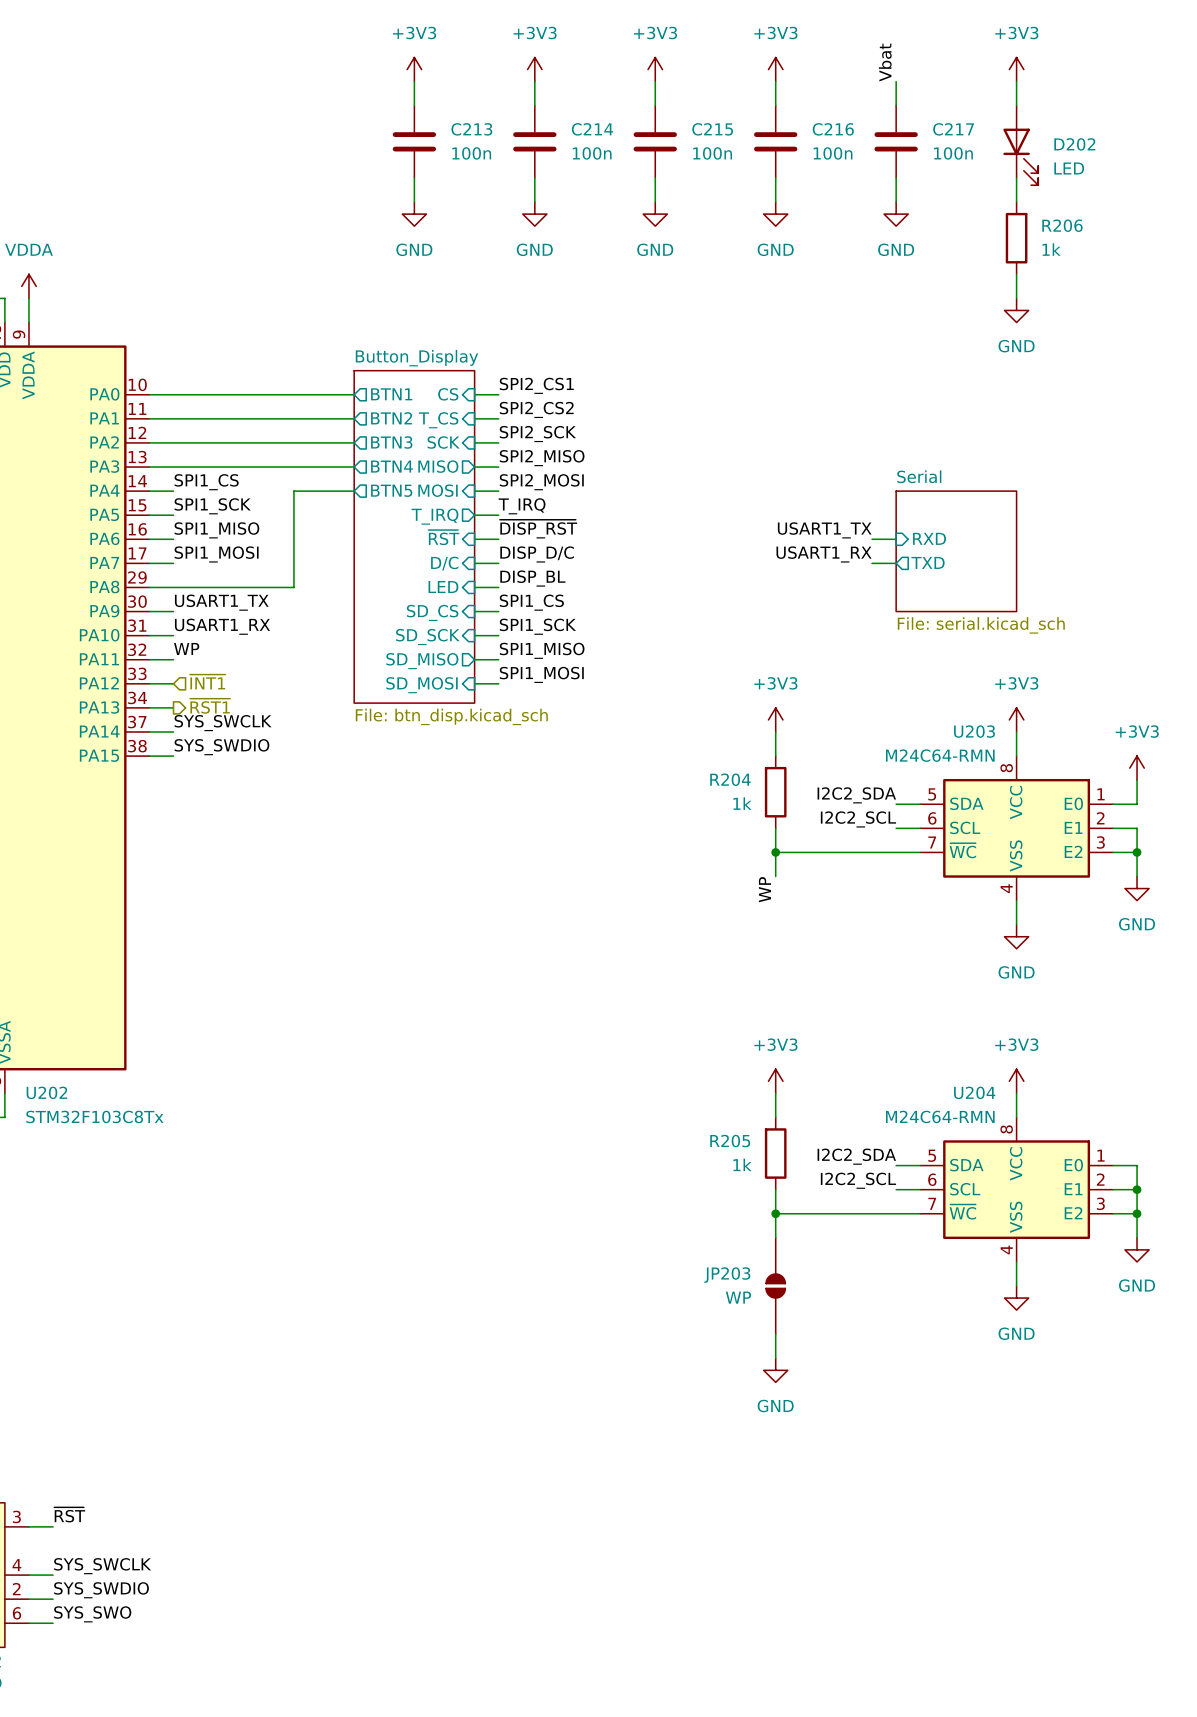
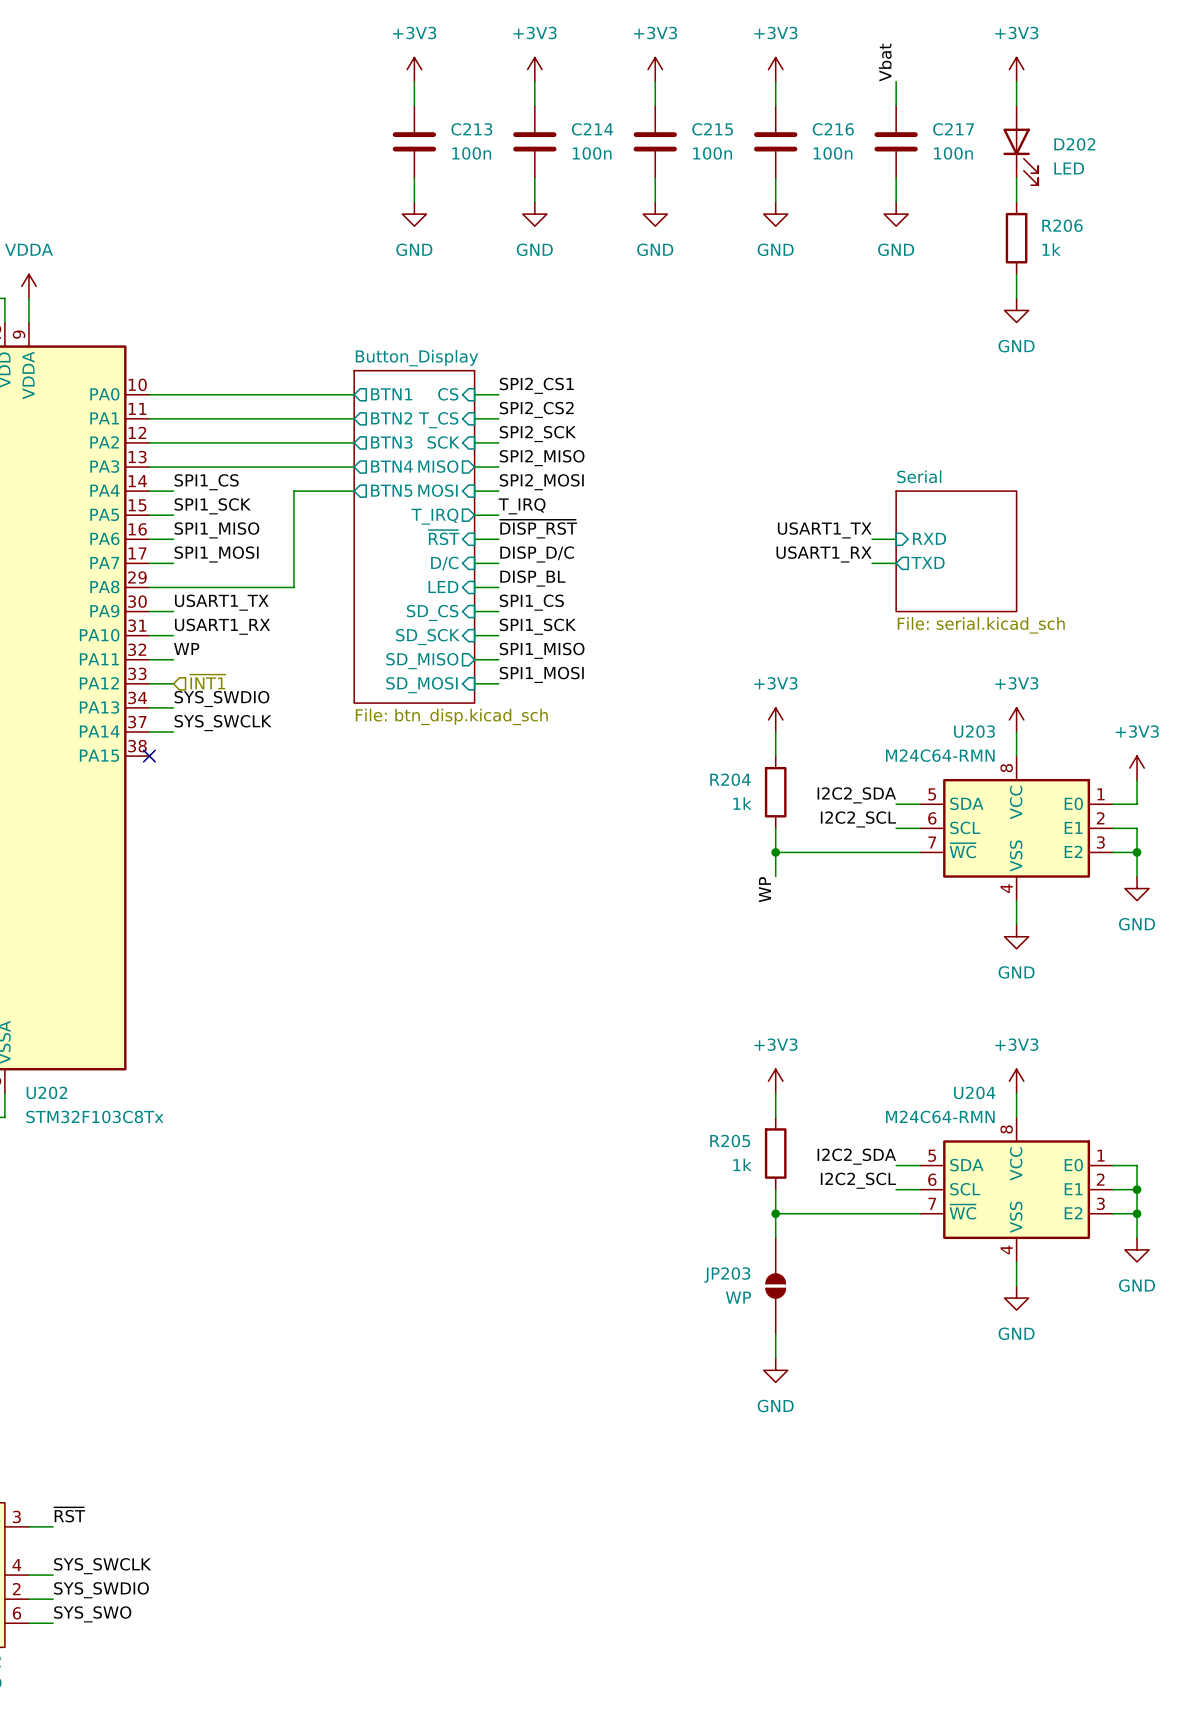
hierarchical label: ~{RST1} (210, 706) -> none
label position: SYS_SWDIO (221, 747) -> SYS_SWDIO (221, 699)
wire: (149, 756) (173, 756) -> none
no-connect mark: none -> (149, 756)

